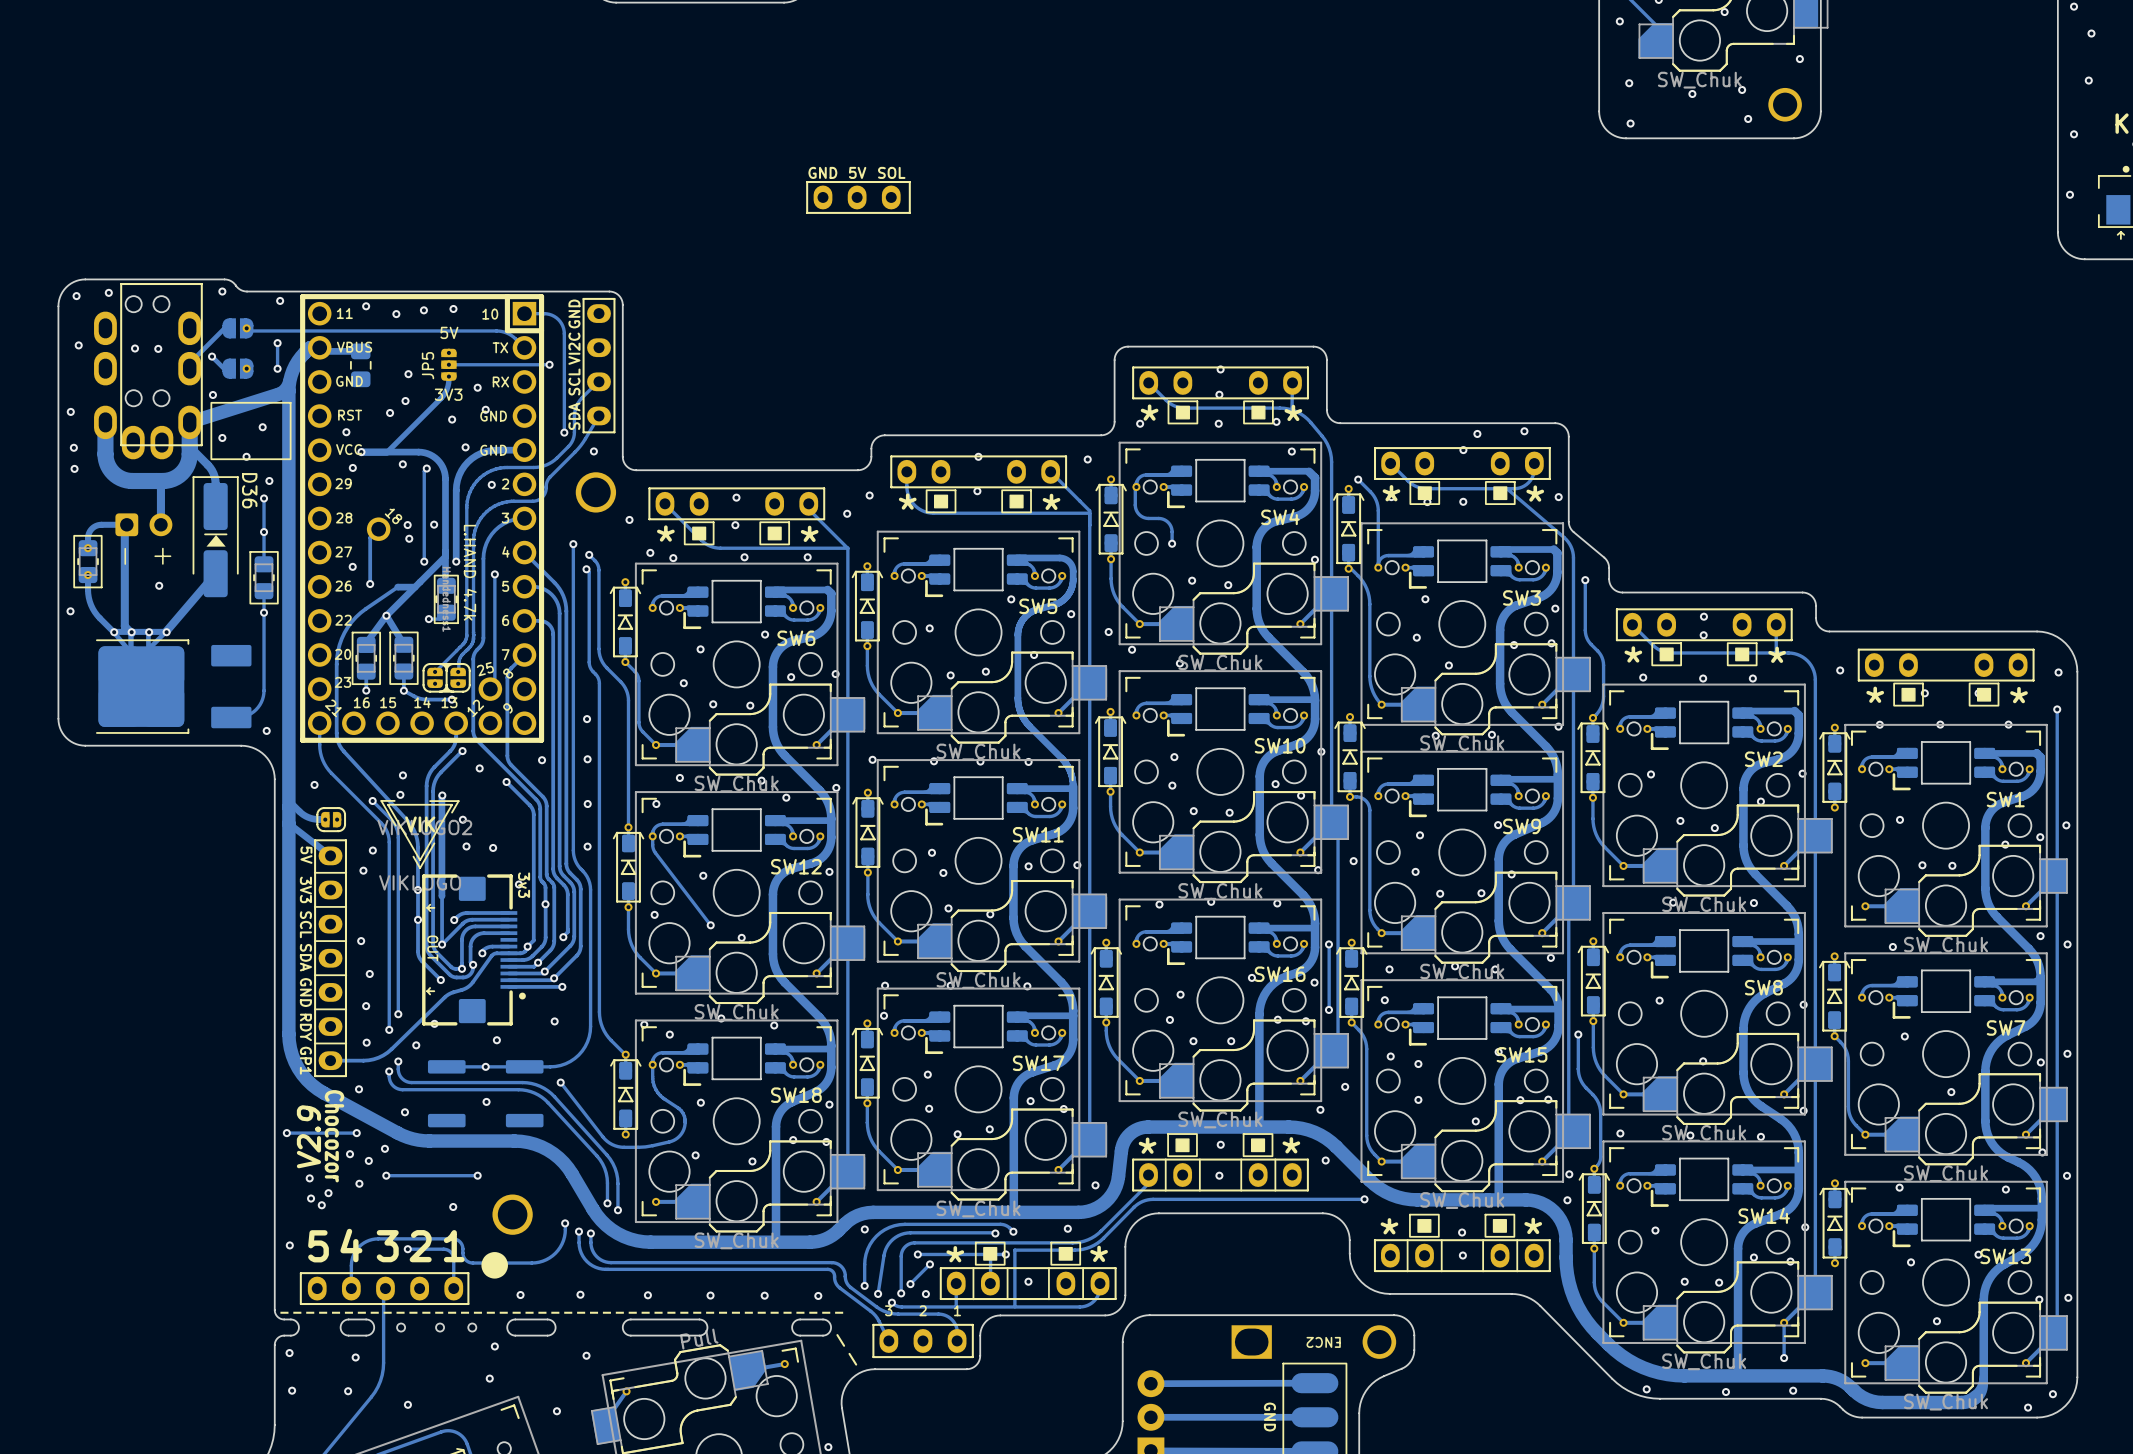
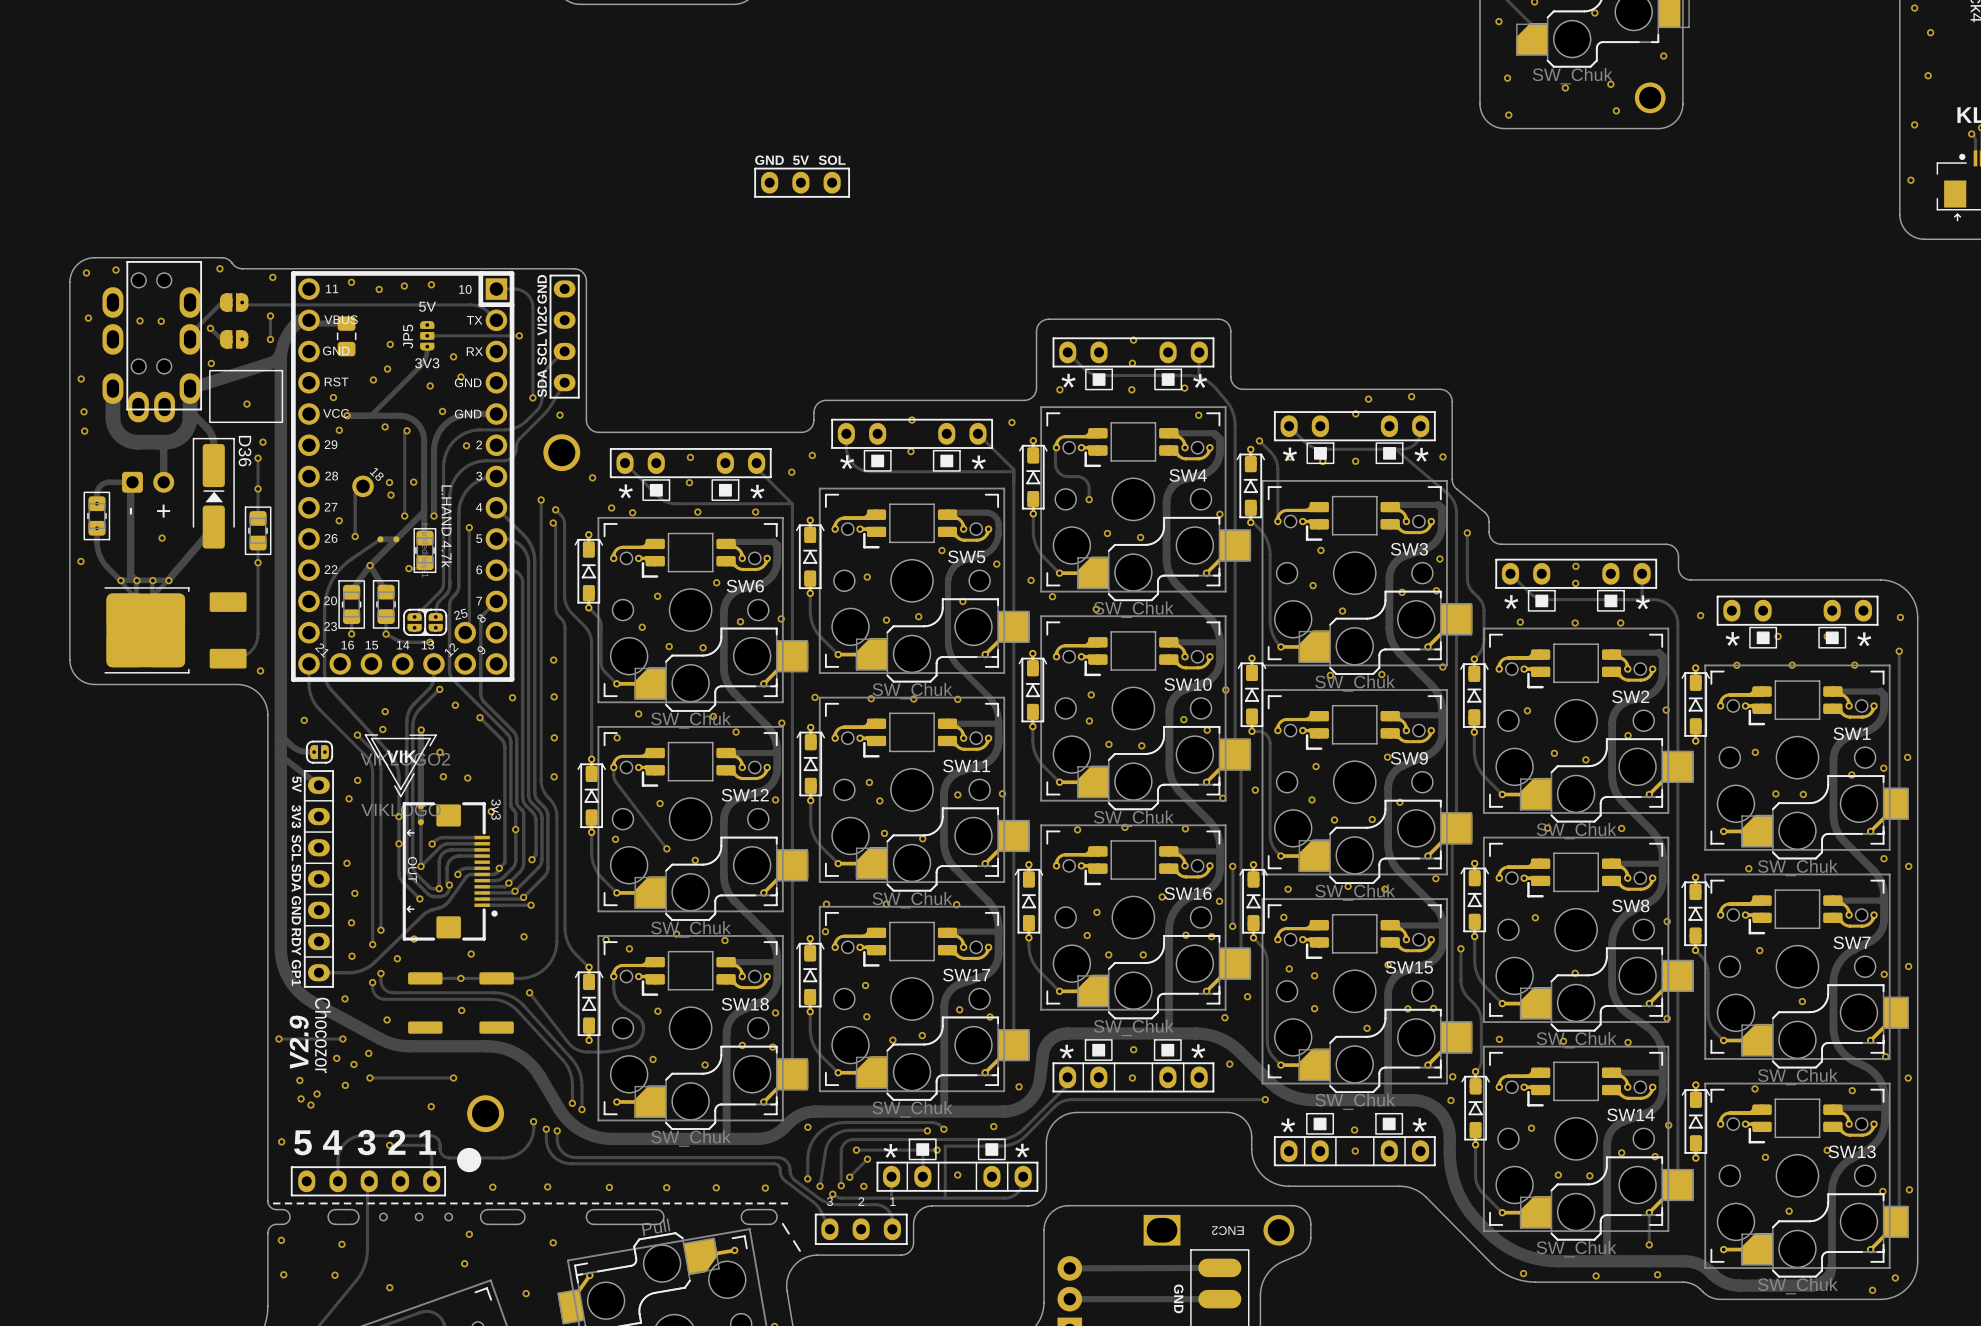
via: (262, 427) -> none
via: (222, 437) -> none
via: none -> (246, 404)
via: (246, 456) -> none

